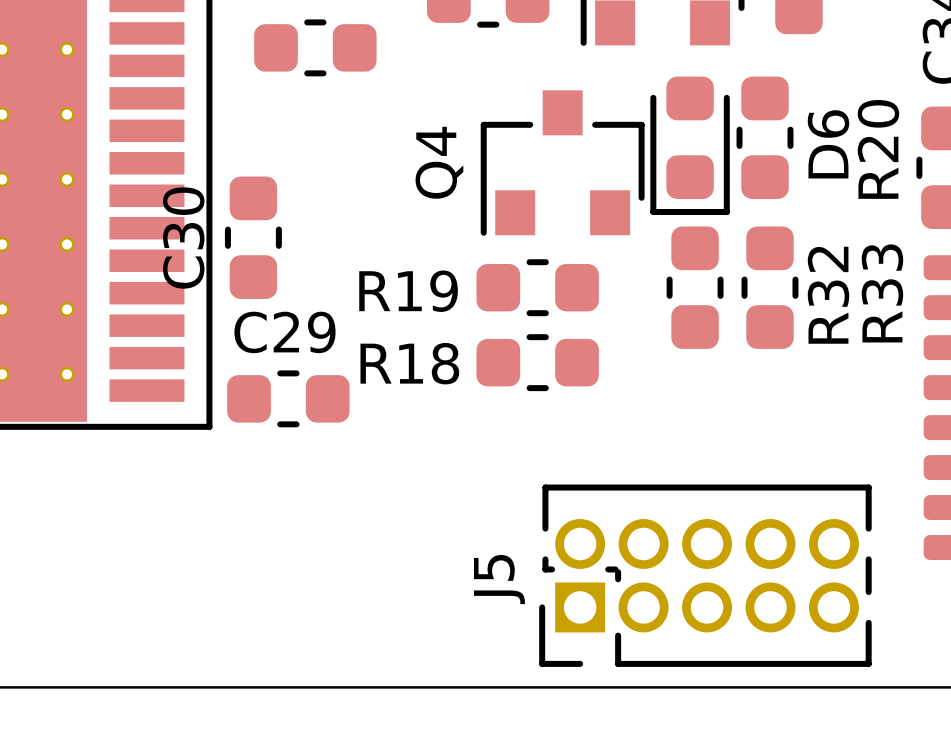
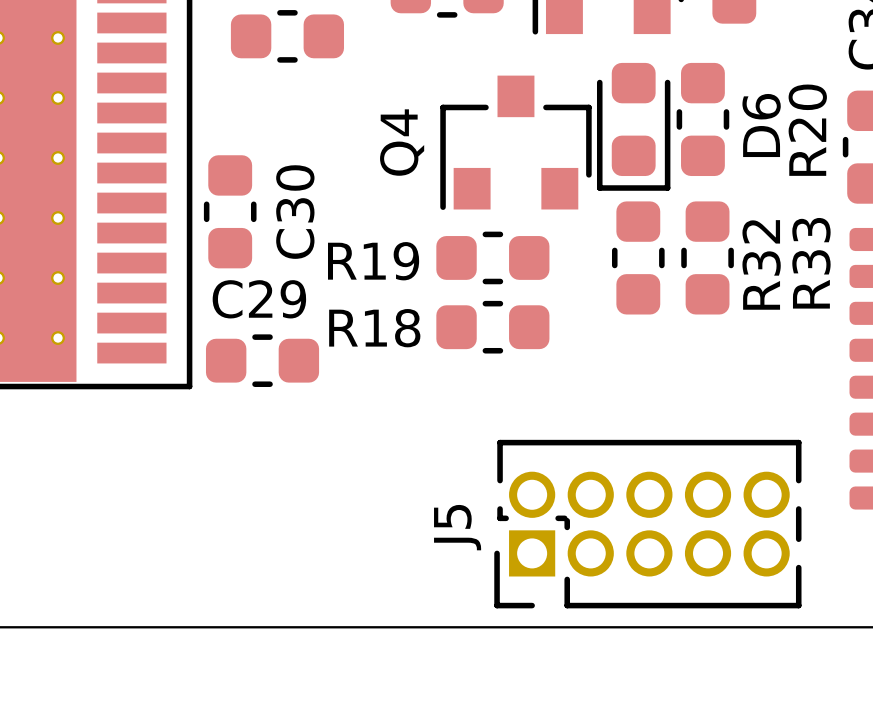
C30 name position: C30 (183, 238) -> C30 (295, 212)

